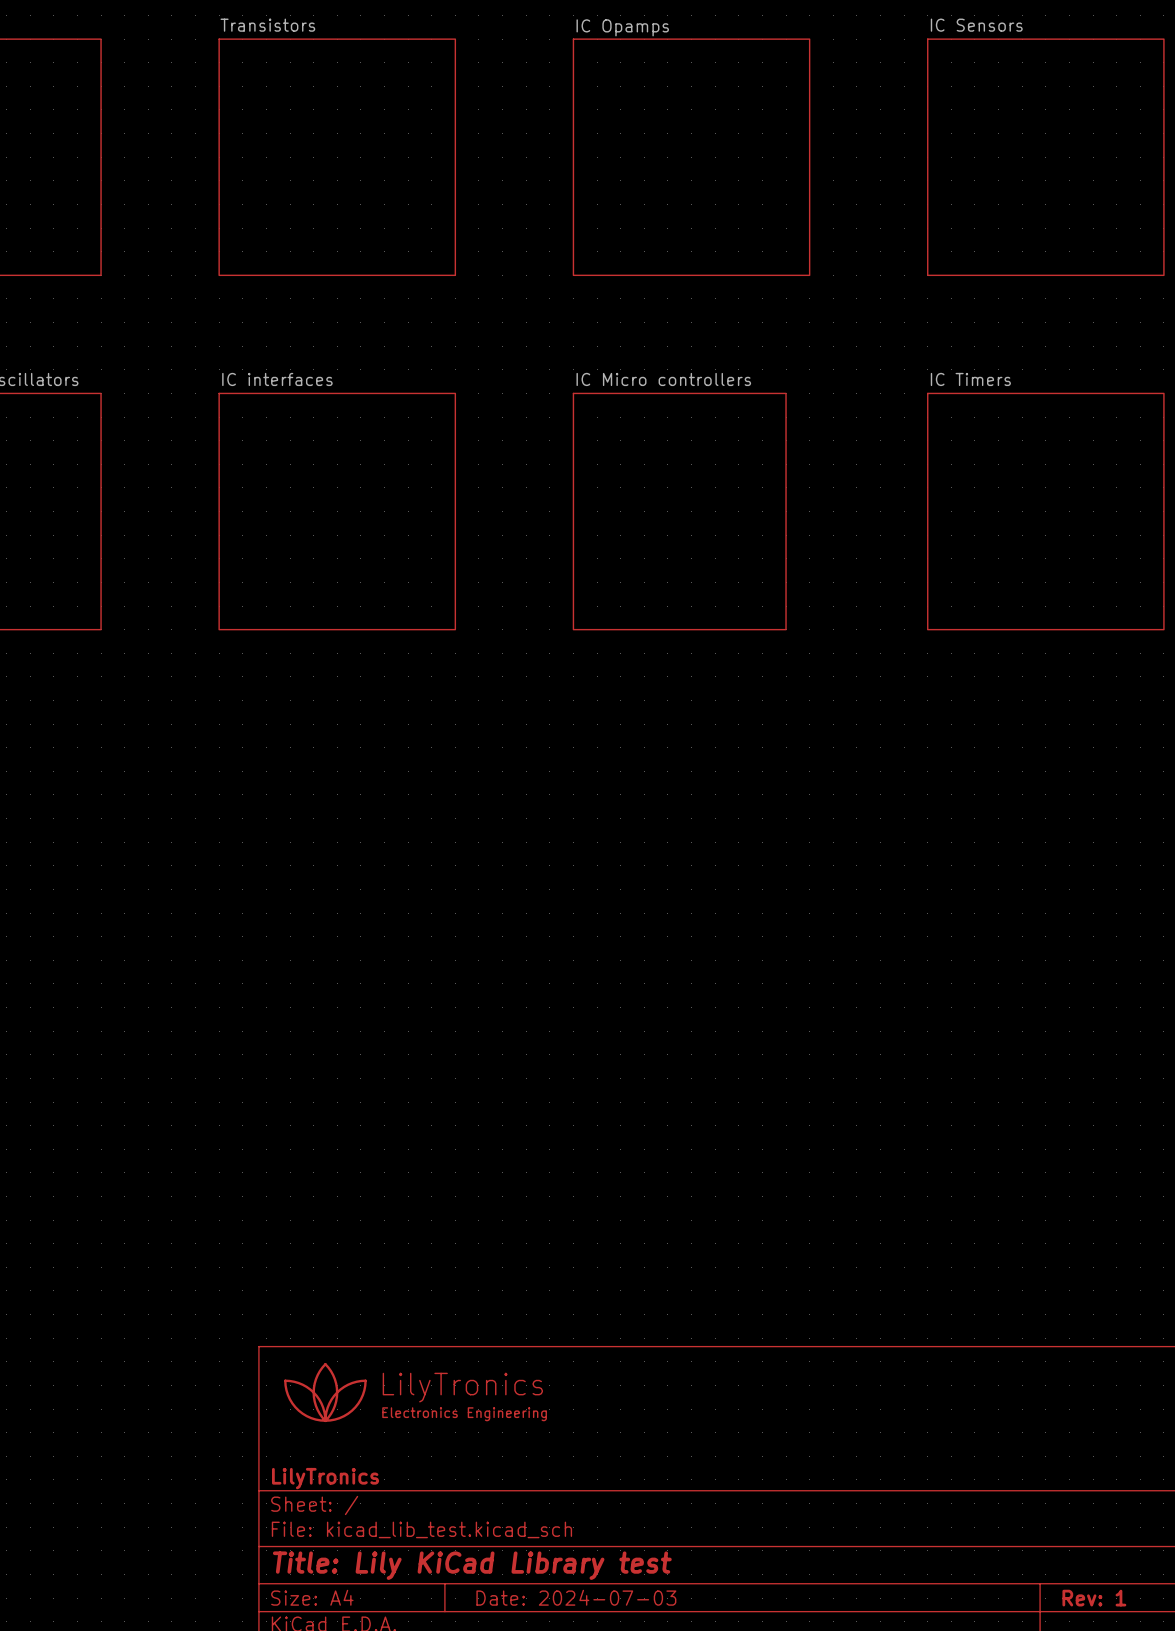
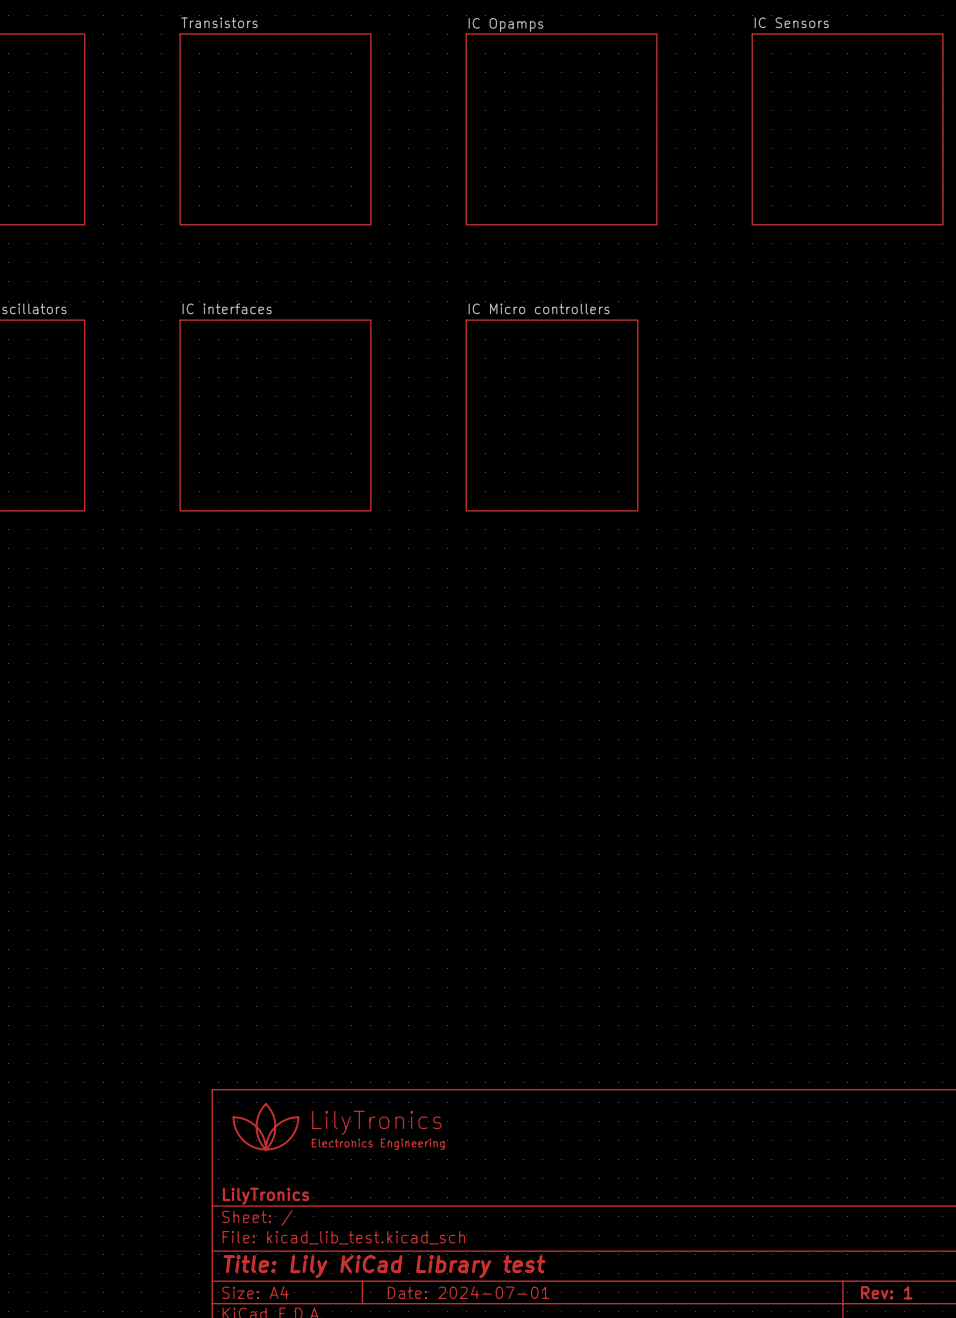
sheet IC Timers: (1045, 511) -> none
title block: Date: 2024-07-03 (576, 1597) -> Date: 2024-07-01 (468, 1292)

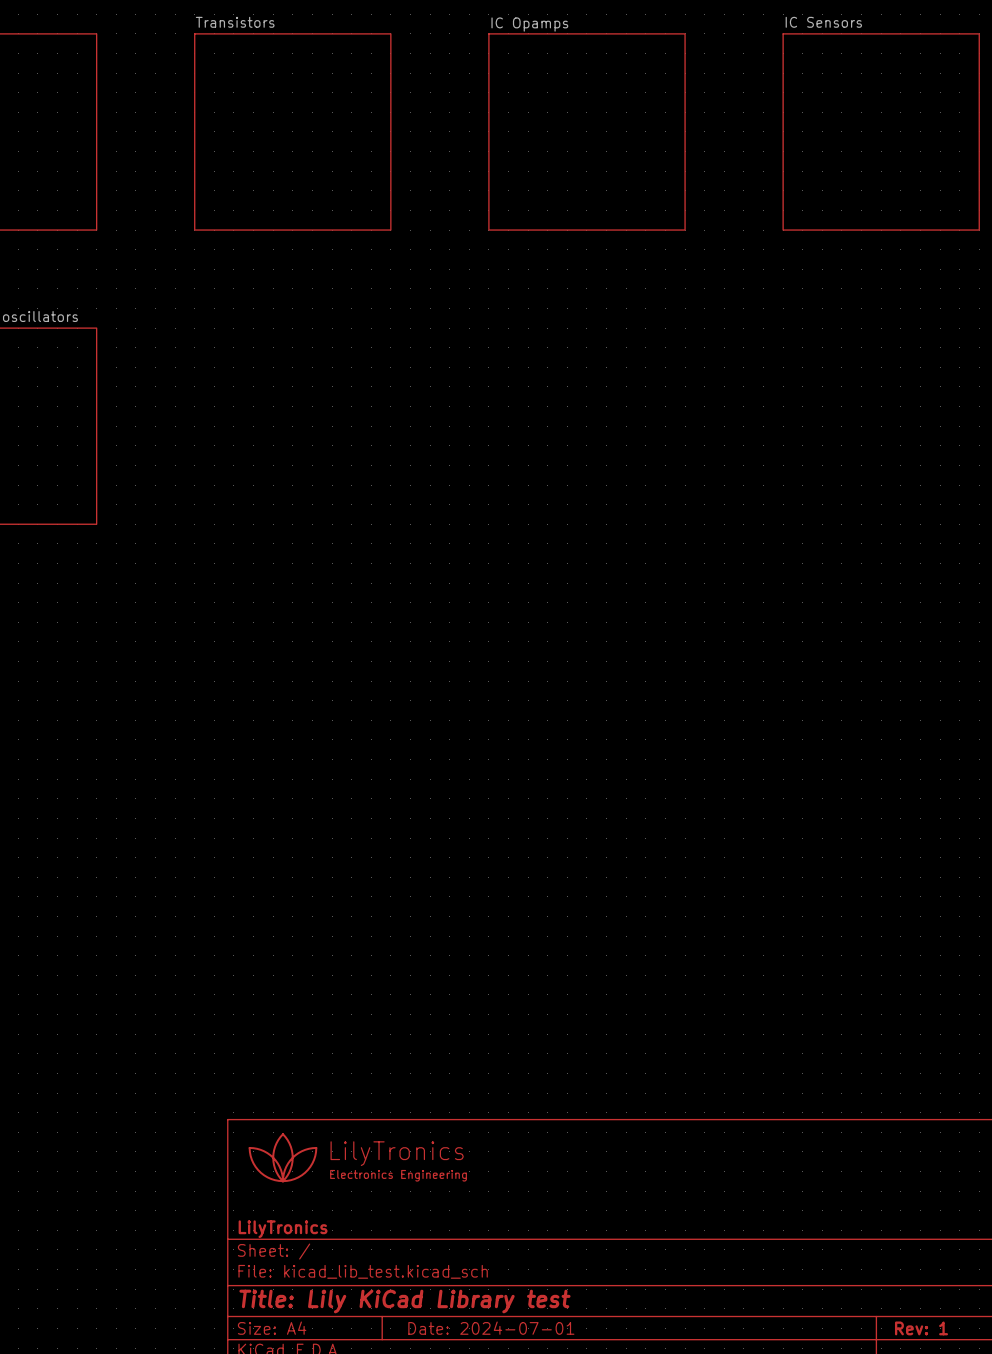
sheet IC interfaces: (275, 415) -> none
sheet IC Micro controllers: (551, 415) -> none

